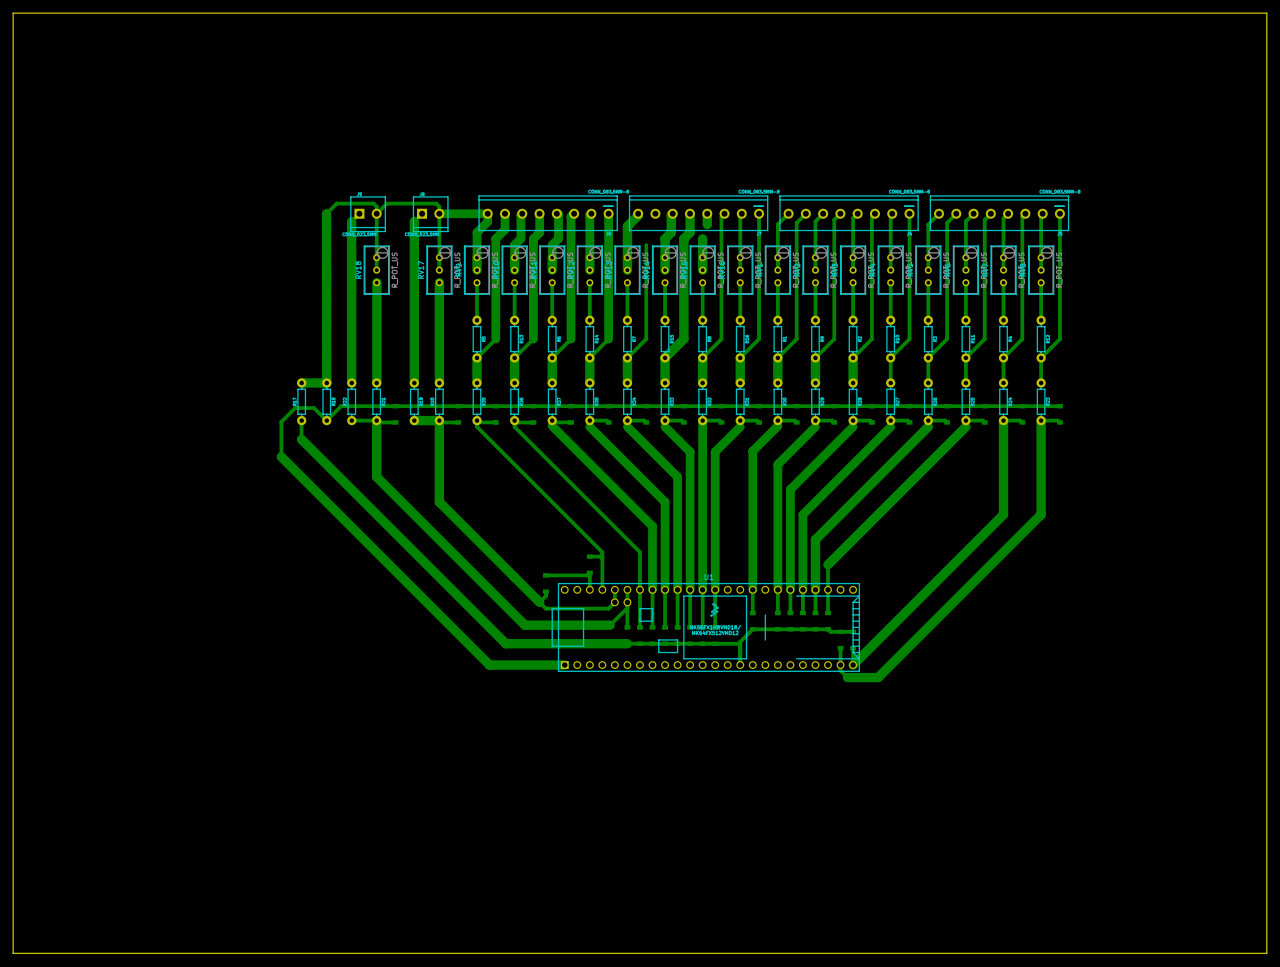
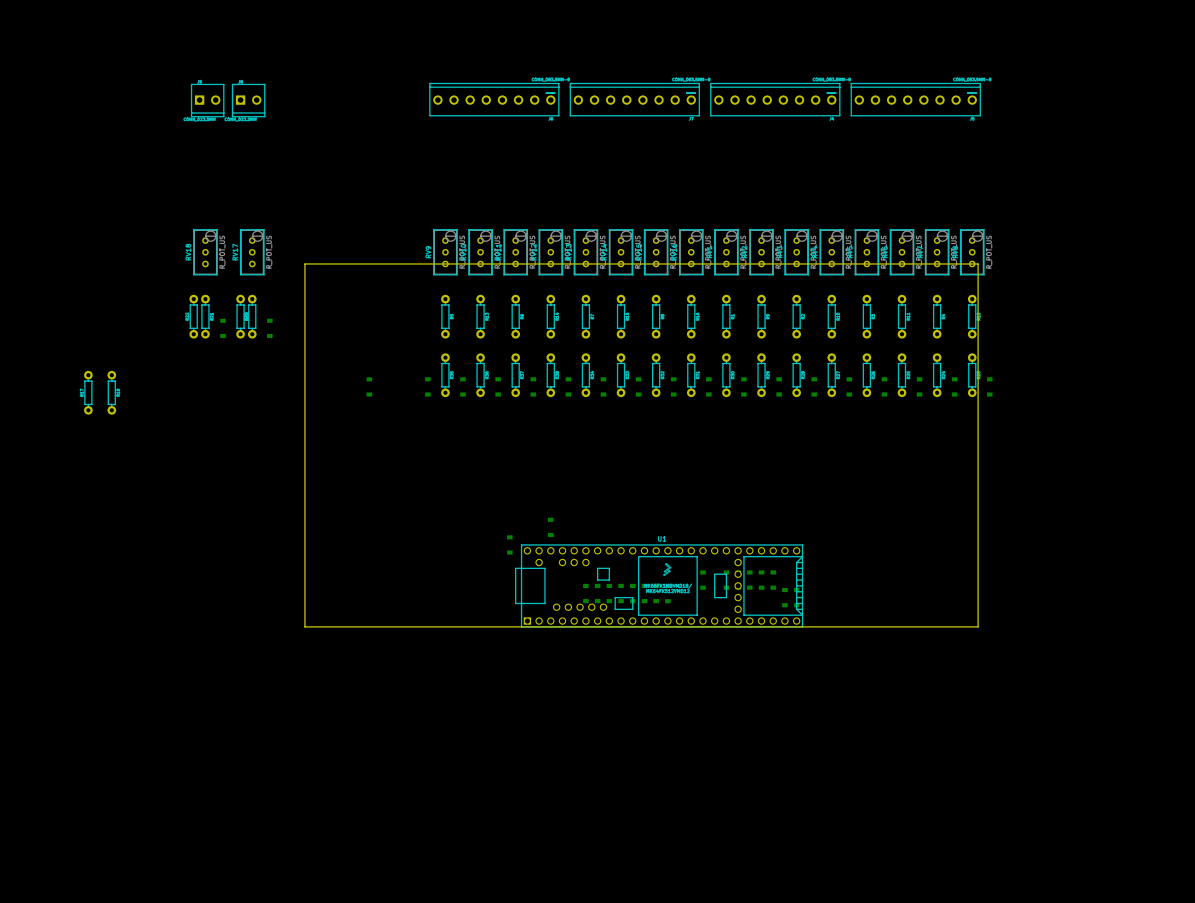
board edge: (13, 13) (1266, 13) (1266, 953) (13, 953) (13, 13) -> none
bottom track: (359, 213) (351, 221) (351, 382) -> none
bottom track: (376, 213) (386, 203) (436, 203) (439, 206) (439, 213) -> none
bottom track: (422, 213) (414, 221) (414, 382) -> none
bottom track: (439, 213) (487, 213) (487, 221) (477, 232) (477, 270) -> none
bottom track: (439, 213) (439, 270) -> none
bottom track: (504, 213) (504, 229) (495, 238) (495, 339) (477, 357) (477, 382) -> none
bottom track: (522, 213) (520, 238) (514, 245) (514, 270) -> none
bottom track: (539, 213) (539, 232) (533, 238) (533, 339) (514, 357) (514, 382) -> none
part position: (548, 213) -> (494, 99)
bottom track: (558, 213) (558, 238) (552, 245) (552, 270) -> none
bottom track: (574, 213) (571, 216) (571, 339) (552, 357) (552, 382) -> none
bottom track: (591, 213) (589, 270) -> none
bottom track: (608, 213) (608, 339) (589, 357) (589, 382) -> none
bottom track: (638, 213) (627, 226) (627, 270) -> none
bottom track: (672, 213) (671, 232) (665, 238) (665, 270) -> none
bottom track: (690, 213) (690, 232) (683, 238) (683, 339) (665, 357) (665, 382) -> none
part position: (698, 213) -> (634, 99)
bottom track: (707, 213) (707, 224) -> none
bottom track: (724, 213) (721, 216) (721, 339) (702, 357) (702, 382) -> none
bottom track: (741, 213) (740, 270) -> none
bottom track: (759, 213) (759, 339) (740, 357) (740, 382) -> none
bottom track: (788, 213) (777, 224) (777, 270) -> none
bottom track: (805, 213) (796, 222) (796, 339) (777, 357) (777, 382) -> none
bottom track: (823, 213) (815, 221) (815, 270) -> none
bottom track: (840, 213) (834, 219) (834, 339) (815, 357) (815, 382) -> none
part position: (849, 213) -> (775, 99)
bottom track: (857, 213) (853, 218) (853, 270) -> none
bottom track: (874, 213) (871, 216) (871, 339) (853, 357) (853, 382) -> none
bottom track: (892, 213) (890, 270) -> none
bottom track: (909, 213) (909, 339) (890, 357) (890, 382) -> none
bottom track: (939, 213) (928, 224) (928, 270) -> none
bottom track: (956, 213) (947, 222) (947, 339) (928, 357) (928, 382) -> none
bottom track: (973, 213) (965, 221) (965, 270) -> none
bottom track: (990, 213) (984, 220) (984, 339) (965, 357) (965, 382) -> none
part position: (999, 213) -> (915, 99)
bottom track: (1008, 213) (1003, 218) (1003, 270) -> none
bottom track: (1025, 213) (1022, 216) (1022, 339) (1003, 357) (1003, 382) -> none
bottom track: (1042, 213) (1041, 270) -> none
bottom track: (1059, 213) (1059, 339) (1041, 357) (1041, 382) -> none
part position: (368, 214) -> (207, 100)
part position: (430, 214) -> (248, 100)
bottom track: (702, 238) (702, 270) -> none
bottom track: (646, 245) (646, 339) (627, 357) (627, 382) -> none
bottom track: (376, 270) (376, 206) (373, 203) (336, 203) (326, 213) (326, 382) (301, 382) -> none
part position: (376, 270) -> (205, 252)
part position: (439, 270) -> (252, 252)
board edge: none -> (304, 263) (978, 263) (978, 626) (304, 626) (304, 263)
bottom track: (376, 282) (376, 382) -> none
bottom track: (439, 282) (439, 382) -> none
bottom track: (477, 282) (477, 320) -> none
bottom track: (514, 282) (514, 320) -> none
bottom track: (552, 282) (552, 320) -> none
bottom track: (589, 282) (589, 320) -> none
bottom track: (627, 282) (627, 320) -> none
bottom track: (665, 282) (665, 320) -> none
bottom track: (702, 282) (702, 320) -> none
bottom track: (740, 282) (740, 320) -> none
bottom track: (777, 282) (777, 320) -> none
bottom track: (815, 282) (815, 320) -> none
bottom track: (853, 282) (853, 320) -> none
bottom track: (890, 282) (890, 320) -> none
bottom track: (928, 282) (928, 320) -> none
bottom track: (965, 282) (965, 320) -> none
bottom track: (1003, 282) (1003, 320) -> none
bottom track: (1041, 282) (1041, 320) -> none
part: none -> (223, 328)
part: none -> (269, 328)
part position: (301, 401) -> (88, 392)
part position: (326, 401) -> (111, 392)
part position: (351, 401) -> (193, 316)
part position: (376, 401) -> (205, 316)
part position: (414, 401) -> (240, 316)
part position: (439, 401) -> (252, 316)
bottom track: (1059, 406) (341, 406) (326, 420) -> none
bottom track: (301, 420) (301, 439) (505, 643) (715, 643) -> none
bottom track: (326, 420) (314, 408) (295, 408) (281, 421) (281, 456) (489, 665) (564, 665) -> none
bottom track: (351, 420) (377, 420) -> none
bottom track: (414, 420) (439, 420) -> none
bottom track: (439, 420) (439, 502) (539, 602) -> none
bottom track: (439, 420) (441, 422) (458, 422) -> none
bottom track: (395, 422) (378, 422) (376, 420) (376, 477) (524, 625) (610, 625) (627, 607) (627, 589) -> none
bottom track: (495, 422) (478, 422) (477, 420) (477, 426) (602, 552) (602, 589) -> none
bottom track: (533, 422) (516, 422) (514, 420) (514, 426) (639, 552) (639, 627) -> none
bottom track: (570, 422) (554, 422) (552, 420) (552, 426) (652, 526) (652, 627) -> none
bottom track: (608, 422) (606, 420) (589, 420) (589, 426) (665, 502) (665, 627) -> none
bottom track: (646, 422) (644, 420) (627, 420) (627, 426) (677, 477) (677, 627) -> none
bottom track: (683, 422) (681, 420) (665, 420) (665, 426) (690, 451) (690, 627) -> none
bottom track: (721, 422) (719, 420) (702, 420) (702, 627) -> none
bottom track: (759, 422) (757, 420) (740, 420) (740, 426) (715, 451) (715, 627) -> none
bottom track: (796, 422) (794, 420) (777, 420) (777, 426) (752, 451) (752, 613) -> none
bottom track: (834, 422) (832, 420) (815, 420) (815, 426) (777, 464) (777, 613) -> none
bottom track: (871, 422) (870, 420) (853, 420) (853, 426) (790, 489) (790, 613) -> none
bottom track: (909, 422) (907, 420) (890, 420) (890, 426) (802, 514) (802, 613) -> none
bottom track: (947, 422) (945, 420) (928, 420) (928, 426) (815, 539) (815, 613) -> none
bottom track: (984, 422) (982, 420) (965, 420) (965, 426) (828, 564) (828, 613) -> none
bottom track: (1022, 422) (1020, 420) (1003, 420) (1003, 514) (853, 665) (853, 648) -> none
bottom track: (1059, 422) (1058, 420) (1041, 420) (1041, 514) (878, 677) (847, 677) (840, 670) (840, 648) -> none
bottom track: (589, 556) (600, 556) (602, 558) -> none
bottom track: (545, 575) (587, 575) (589, 572) (589, 589) -> none
part footprint: [551, 583, 860, 672] -> [515, 544, 803, 628]
bottom track: (614, 589) (614, 602) (608, 608) (545, 608) (539, 602) -> none
bottom track: (545, 591) (545, 596) (539, 602) -> none
bottom track: (627, 602) (627, 627) -> none
bottom track: (853, 631) (830, 631) (828, 629) (752, 629) (740, 641) (740, 665) -> none
bottom track: (715, 643) (740, 643) -> none

